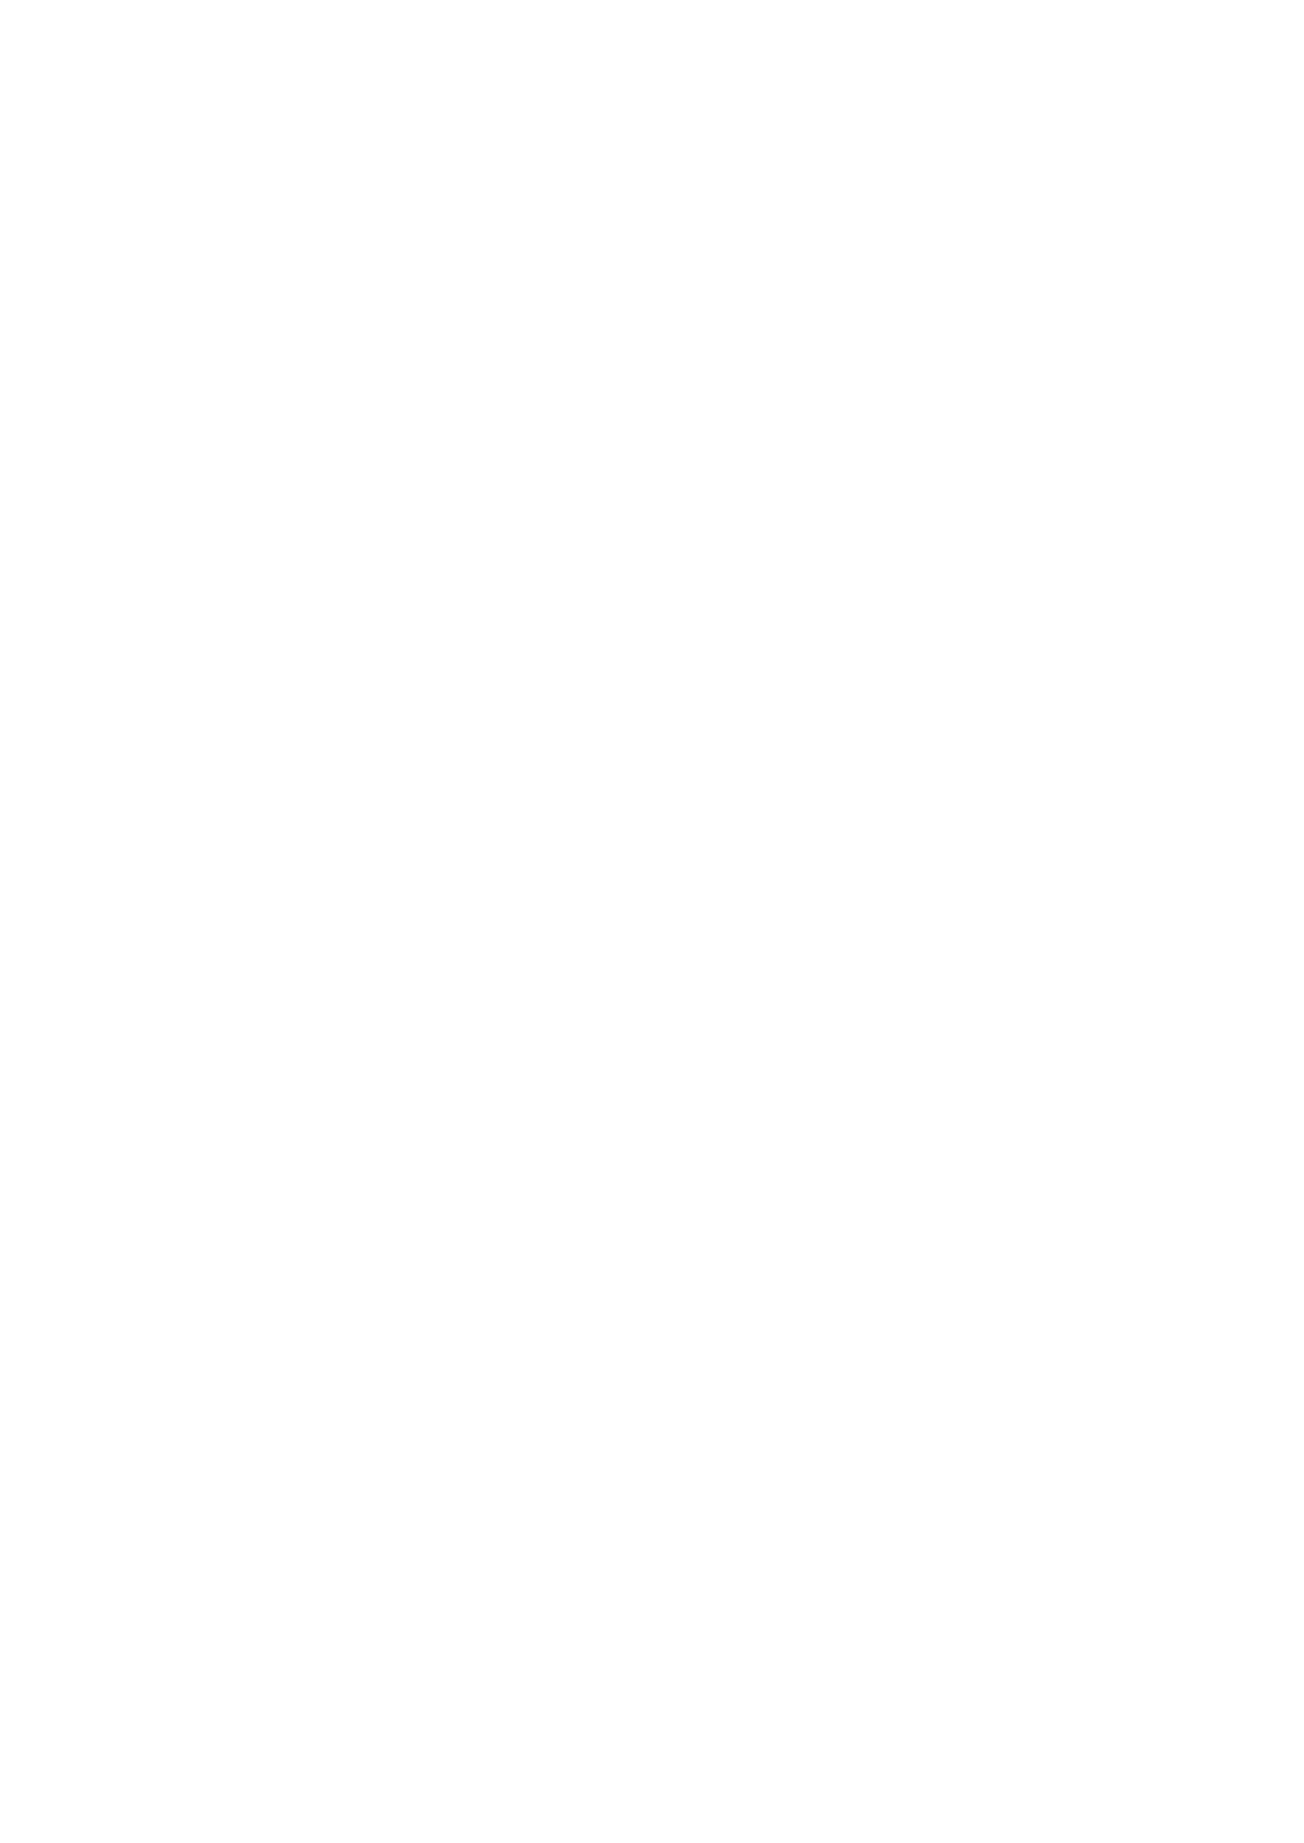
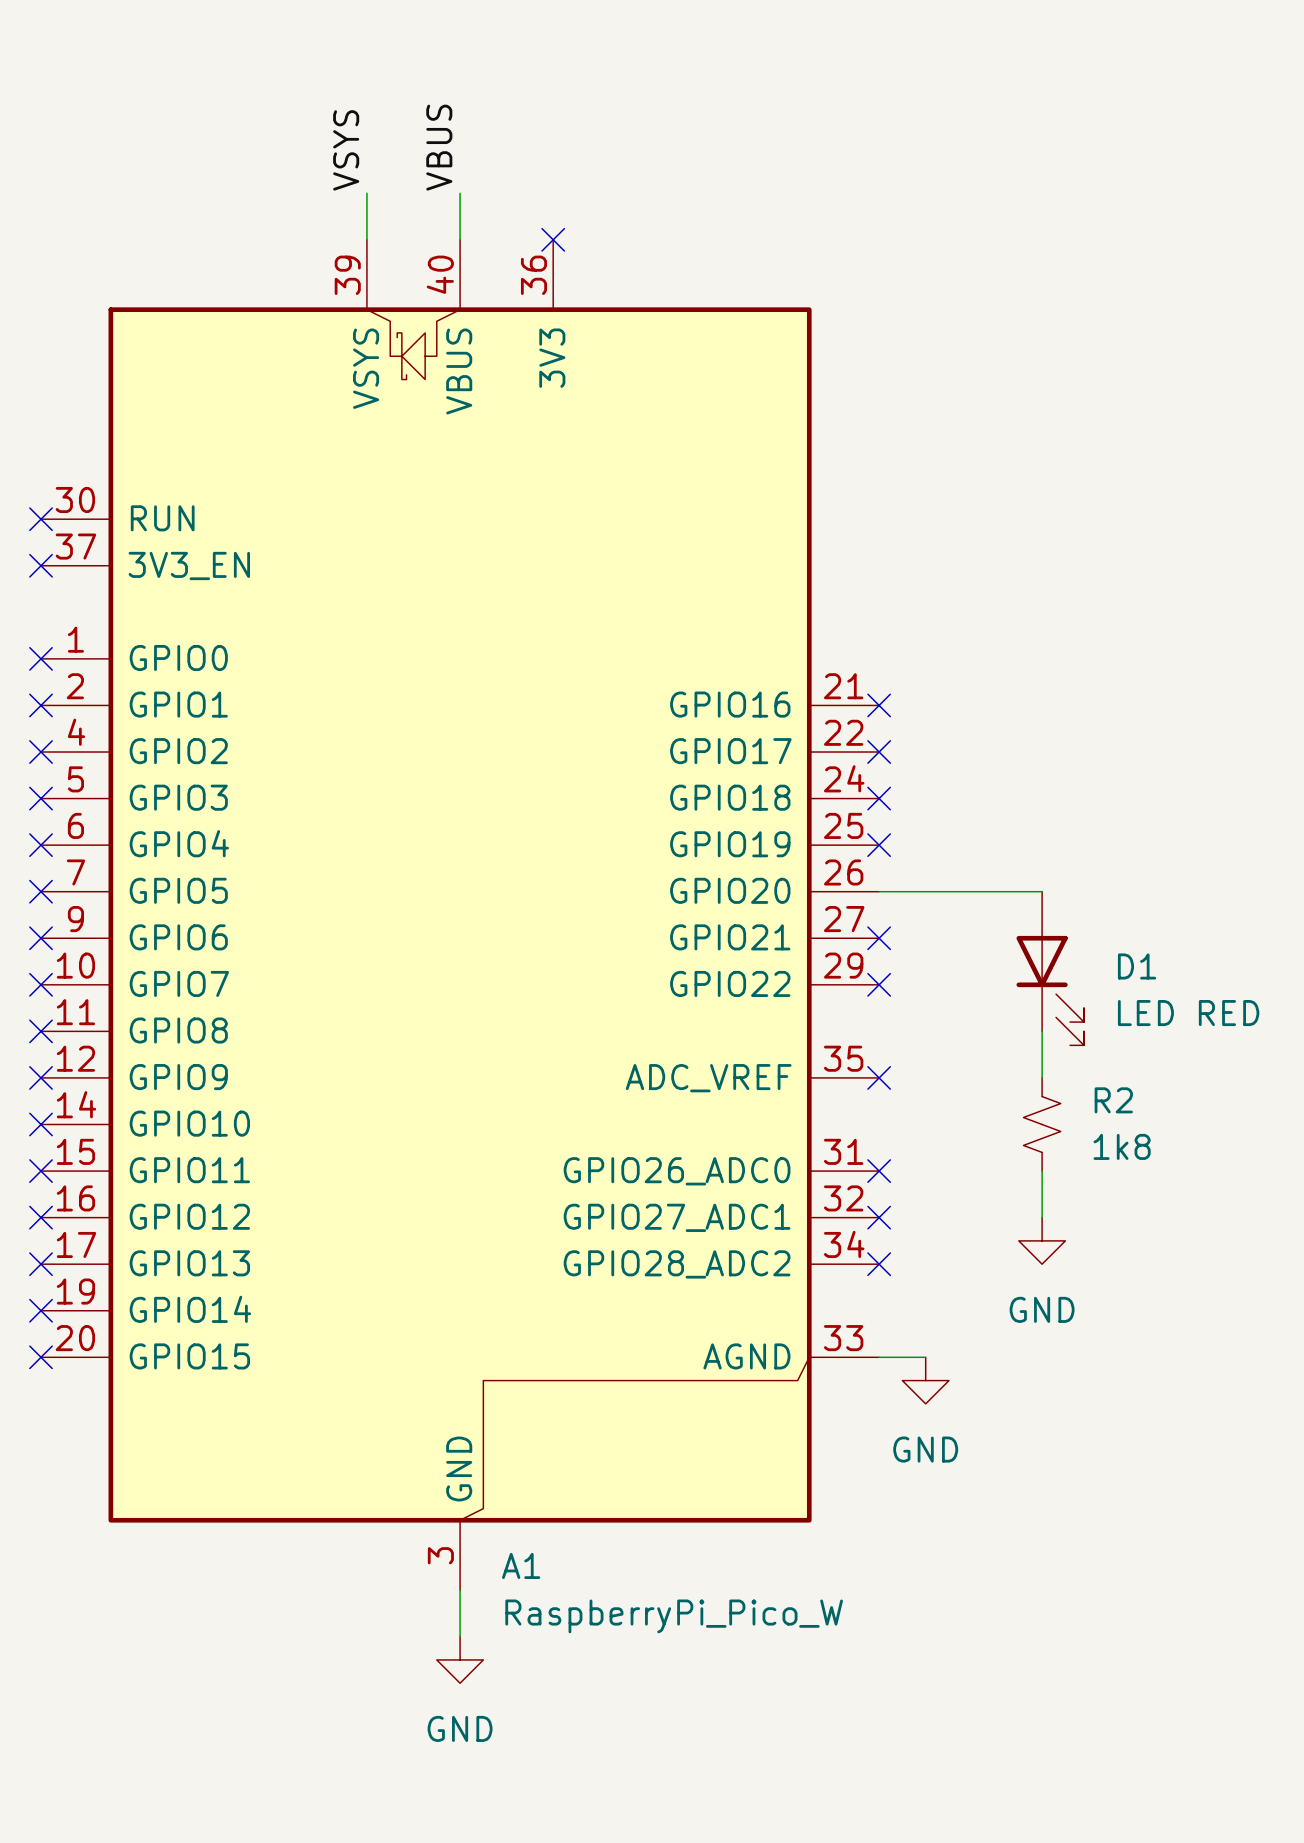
label: none -> VBUS (439, 147)
label: none -> VSYS (346, 150)
wire: none -> (366, 193) (366, 239)
wire: none -> (460, 193) (460, 239)
no-connect mark: none -> (553, 239)
no-connect mark: none -> (41, 519)
no-connect mark: none -> (41, 565)
no-connect mark: none -> (41, 658)
no-connect mark: none -> (41, 705)
no-connect mark: none -> (879, 705)
no-connect mark: none -> (41, 752)
no-connect mark: none -> (879, 752)
no-connect mark: none -> (41, 798)
no-connect mark: none -> (879, 798)
no-connect mark: none -> (41, 845)
no-connect mark: none -> (879, 845)
no-connect mark: none -> (41, 891)
wire: none -> (879, 891) (1042, 891)
A1: none -> RaspberryPi_Pico_W (460, 914)
no-connect mark: none -> (41, 938)
no-connect mark: none -> (879, 938)
D1: none -> LED RED (1050, 968)
no-connect mark: none -> (41, 984)
no-connect mark: none -> (879, 984)
no-connect mark: none -> (41, 1031)
wire: none -> (1042, 1031) (1042, 1077)
no-connect mark: none -> (41, 1077)
no-connect mark: none -> (879, 1077)
no-connect mark: none -> (41, 1124)
R2: none -> 1k8 (1042, 1124)
no-connect mark: none -> (41, 1171)
no-connect mark: none -> (879, 1171)
wire: none -> (1042, 1171) (1042, 1217)
no-connect mark: none -> (41, 1217)
no-connect mark: none -> (879, 1217)
power symbol: none -> GND (1042, 1240)
no-connect mark: none -> (41, 1264)
no-connect mark: none -> (879, 1264)
no-connect mark: none -> (41, 1310)
no-connect mark: none -> (41, 1357)
wire: none -> (879, 1357) (925, 1357)
power symbol: none -> GND (925, 1380)
wire: none -> (460, 1590) (460, 1636)
power symbol: none -> GND (460, 1659)

